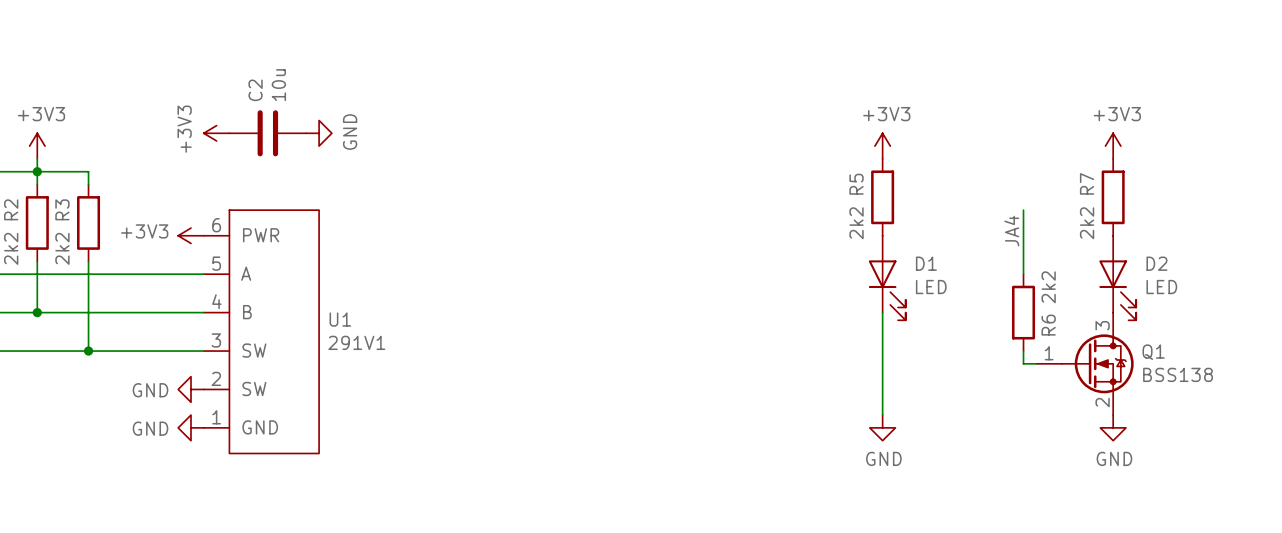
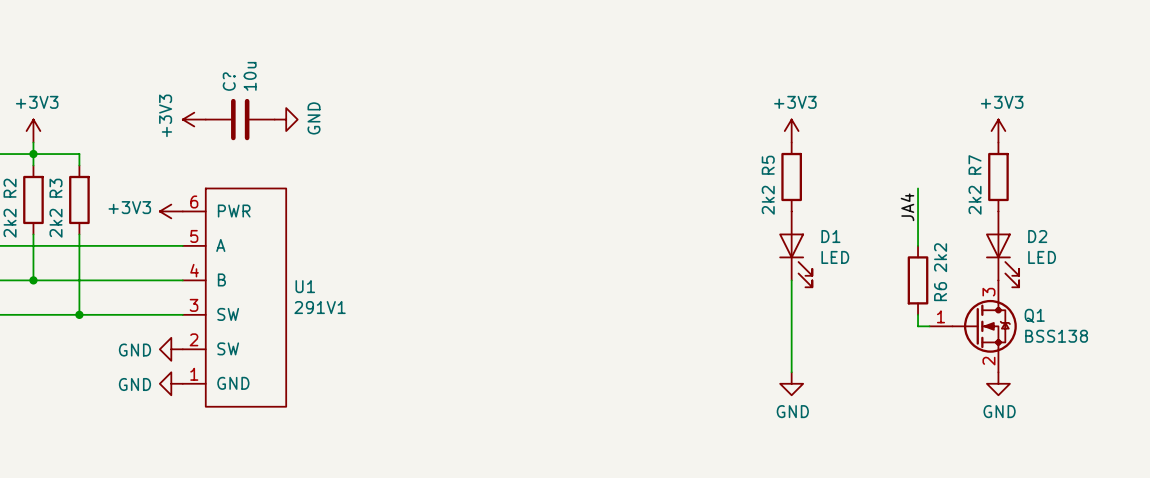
C2 name: C2 (255, 90) -> C? (229, 81)

